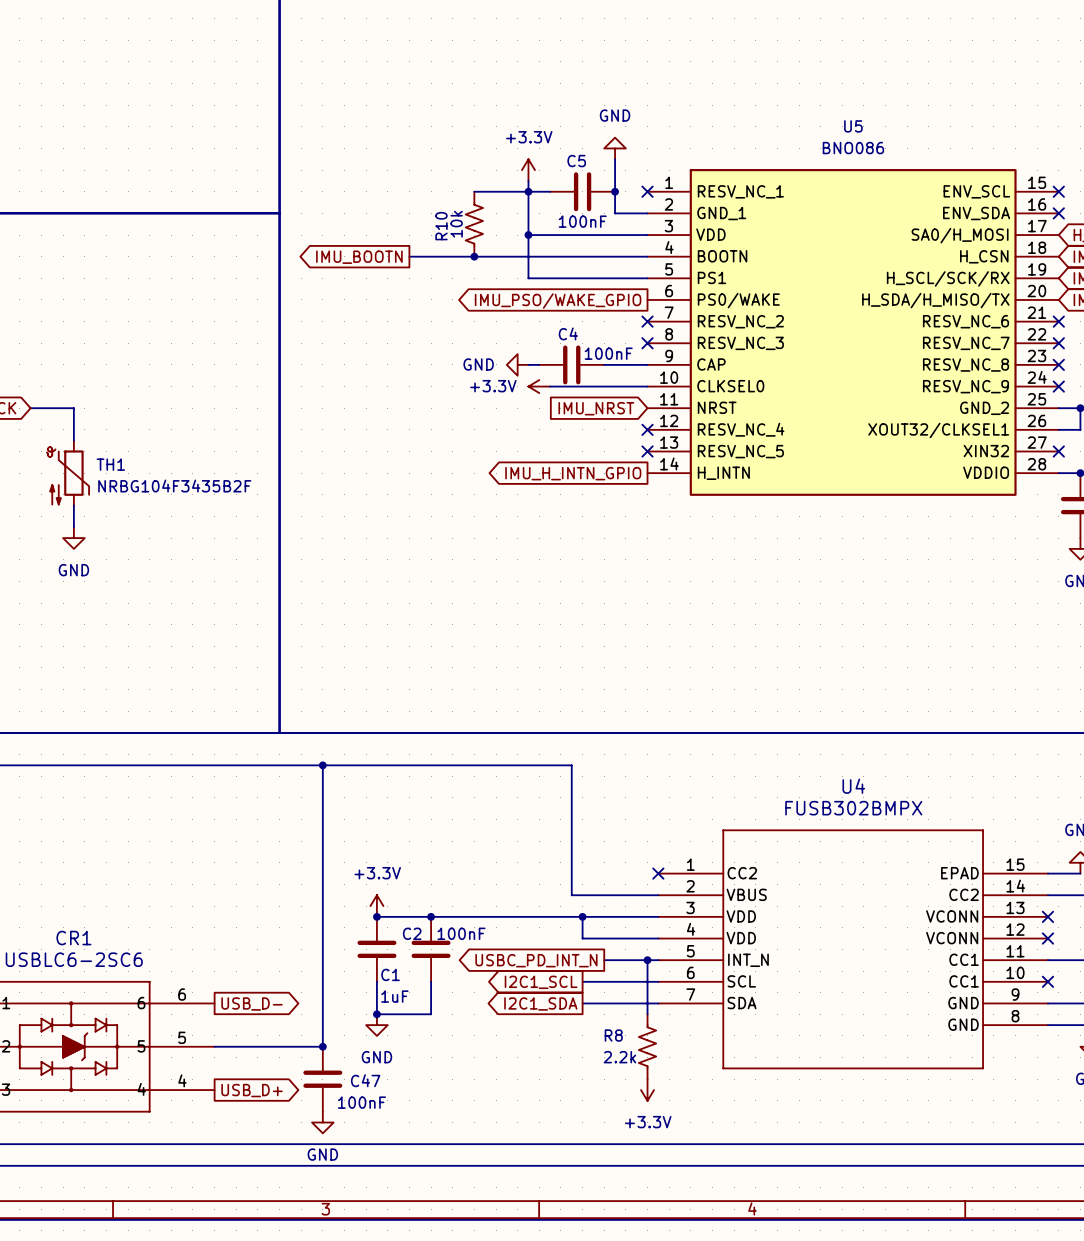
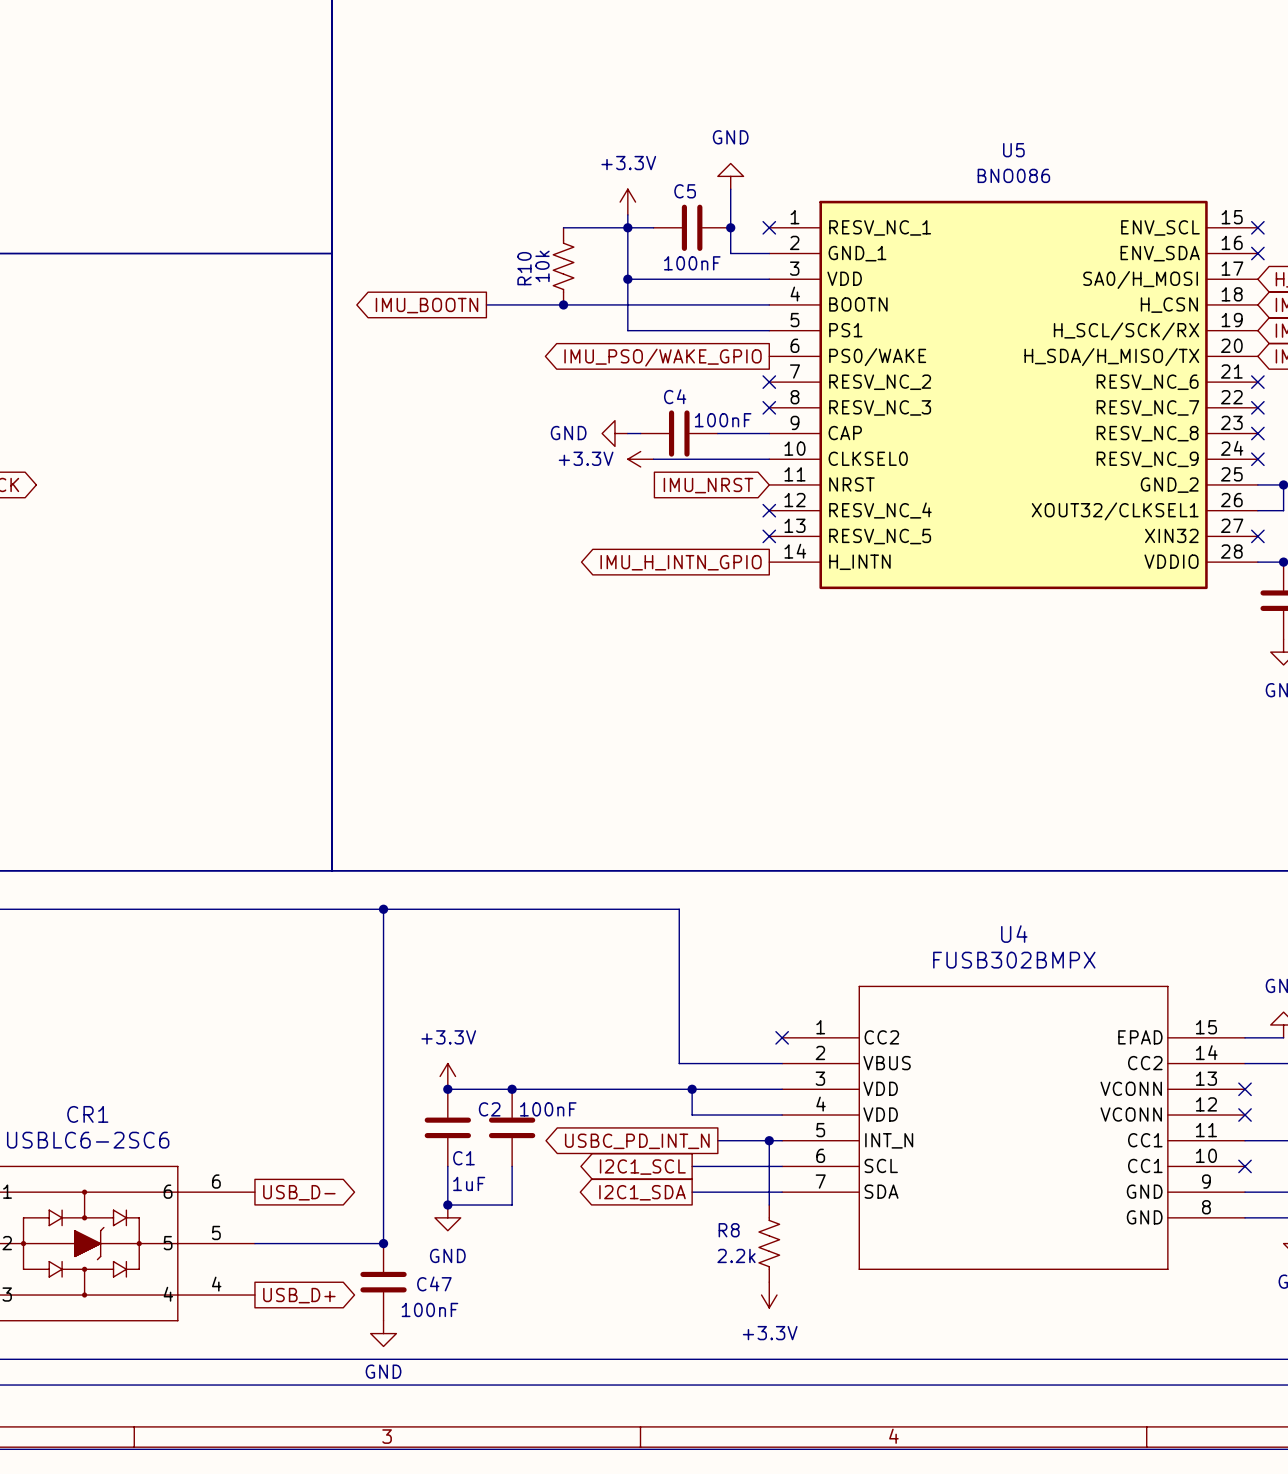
wire: (30, 408) (73, 408) (73, 440) -> none
TH1: NRBG104F3435B2F (67, 473) -> none
wire: (73, 505) (73, 527) -> none
power symbol: GND (73, 538) -> none

